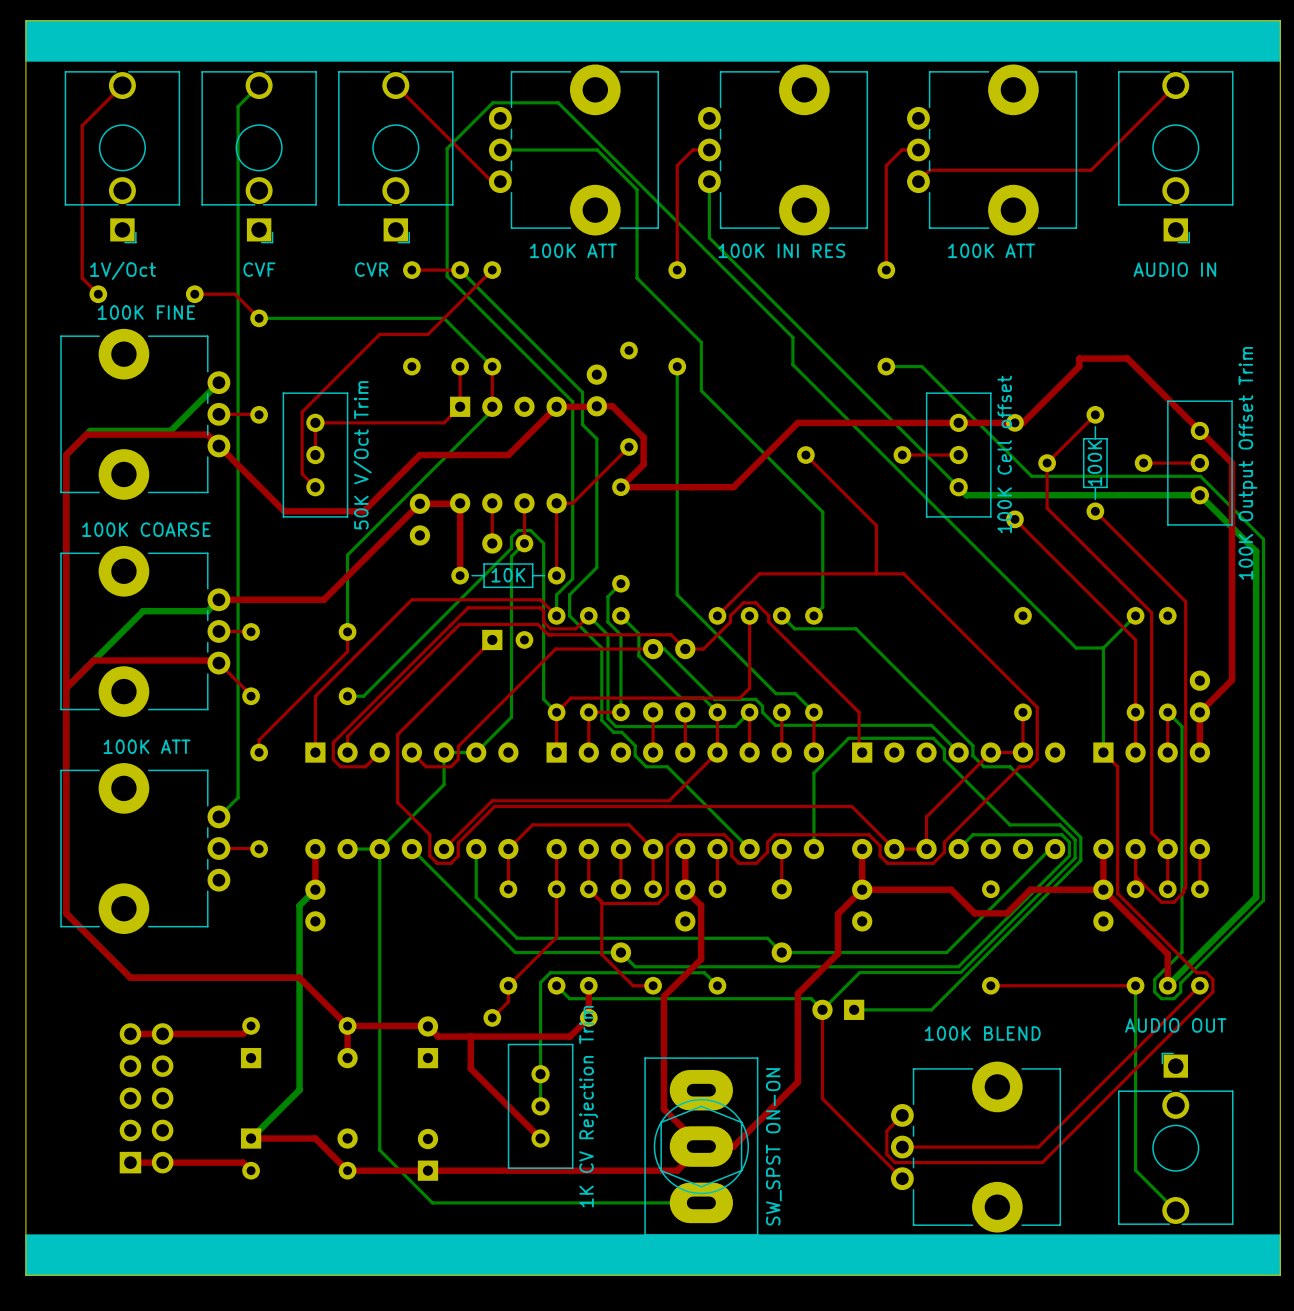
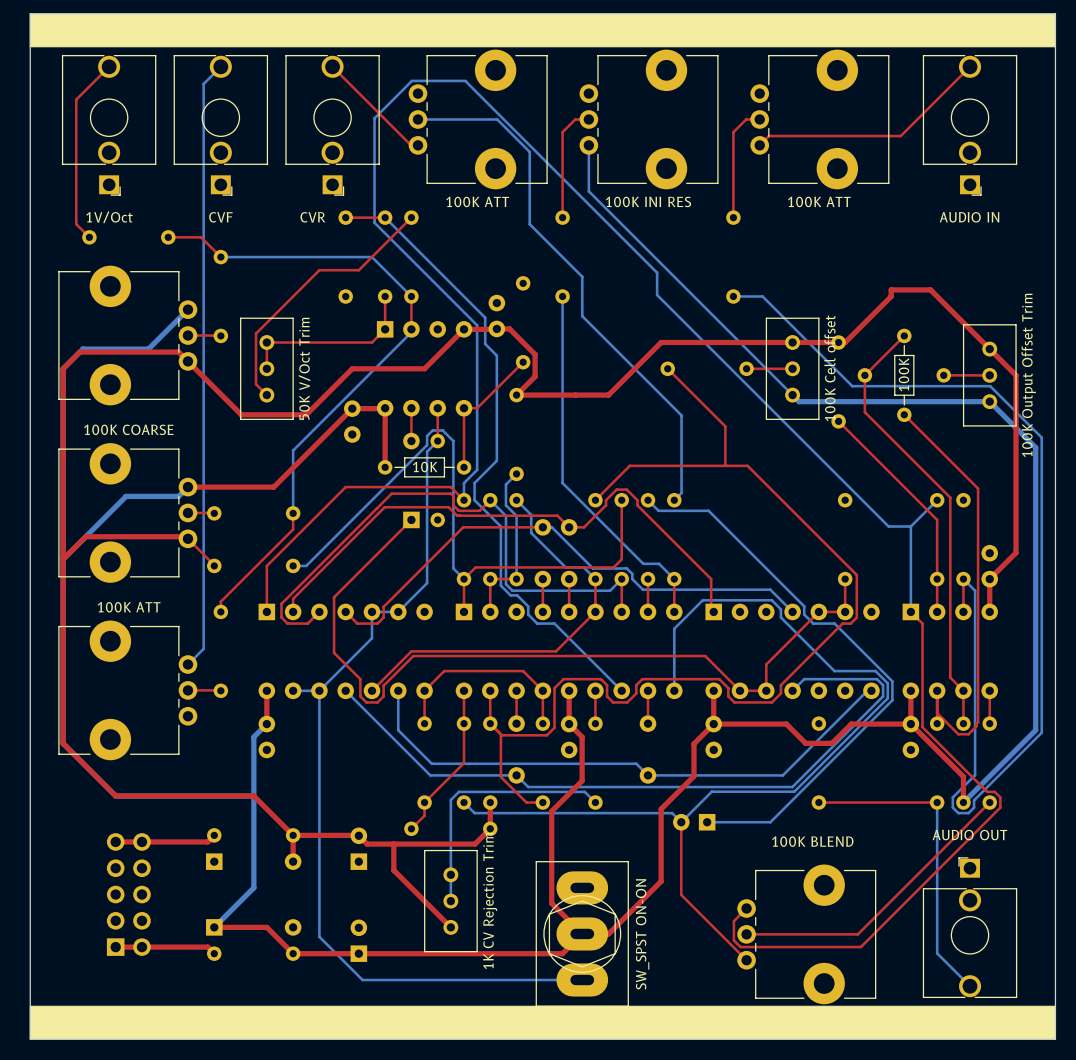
part value: 100K FINE (146, 312) -> none

